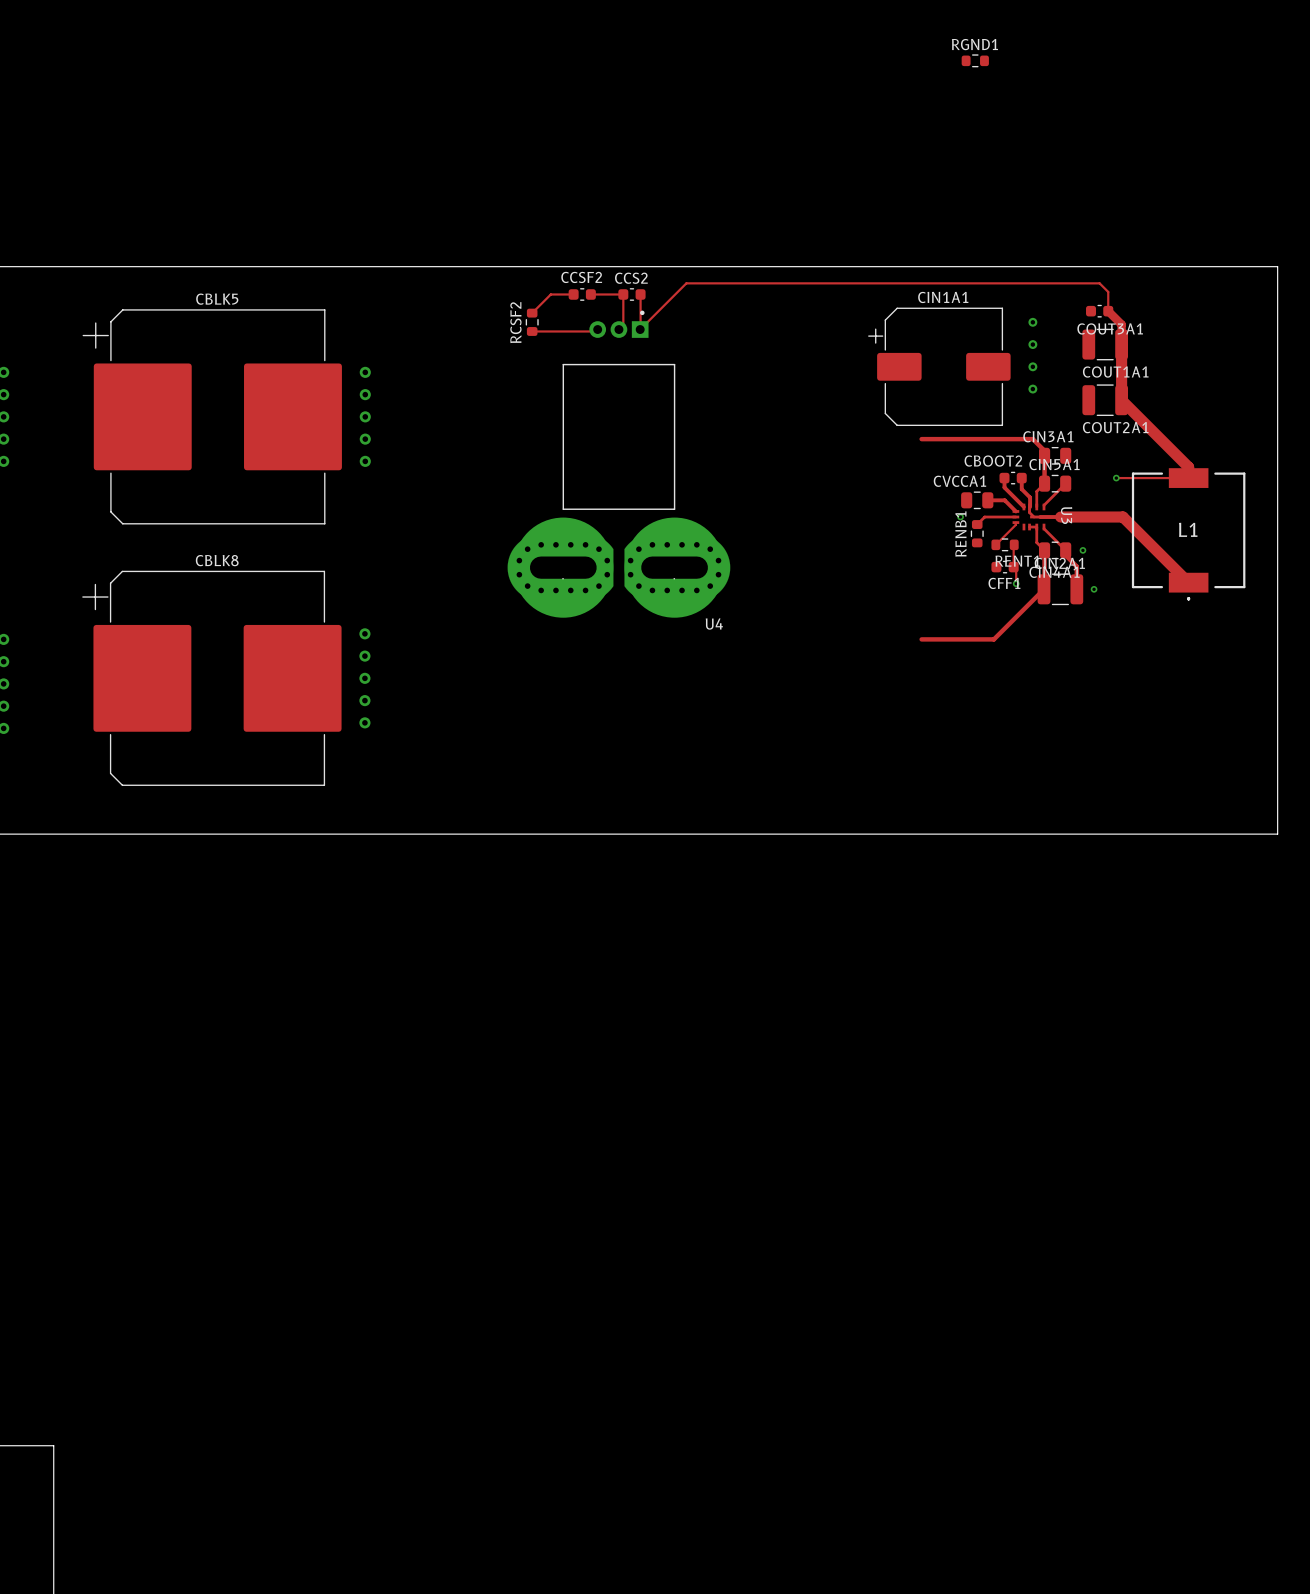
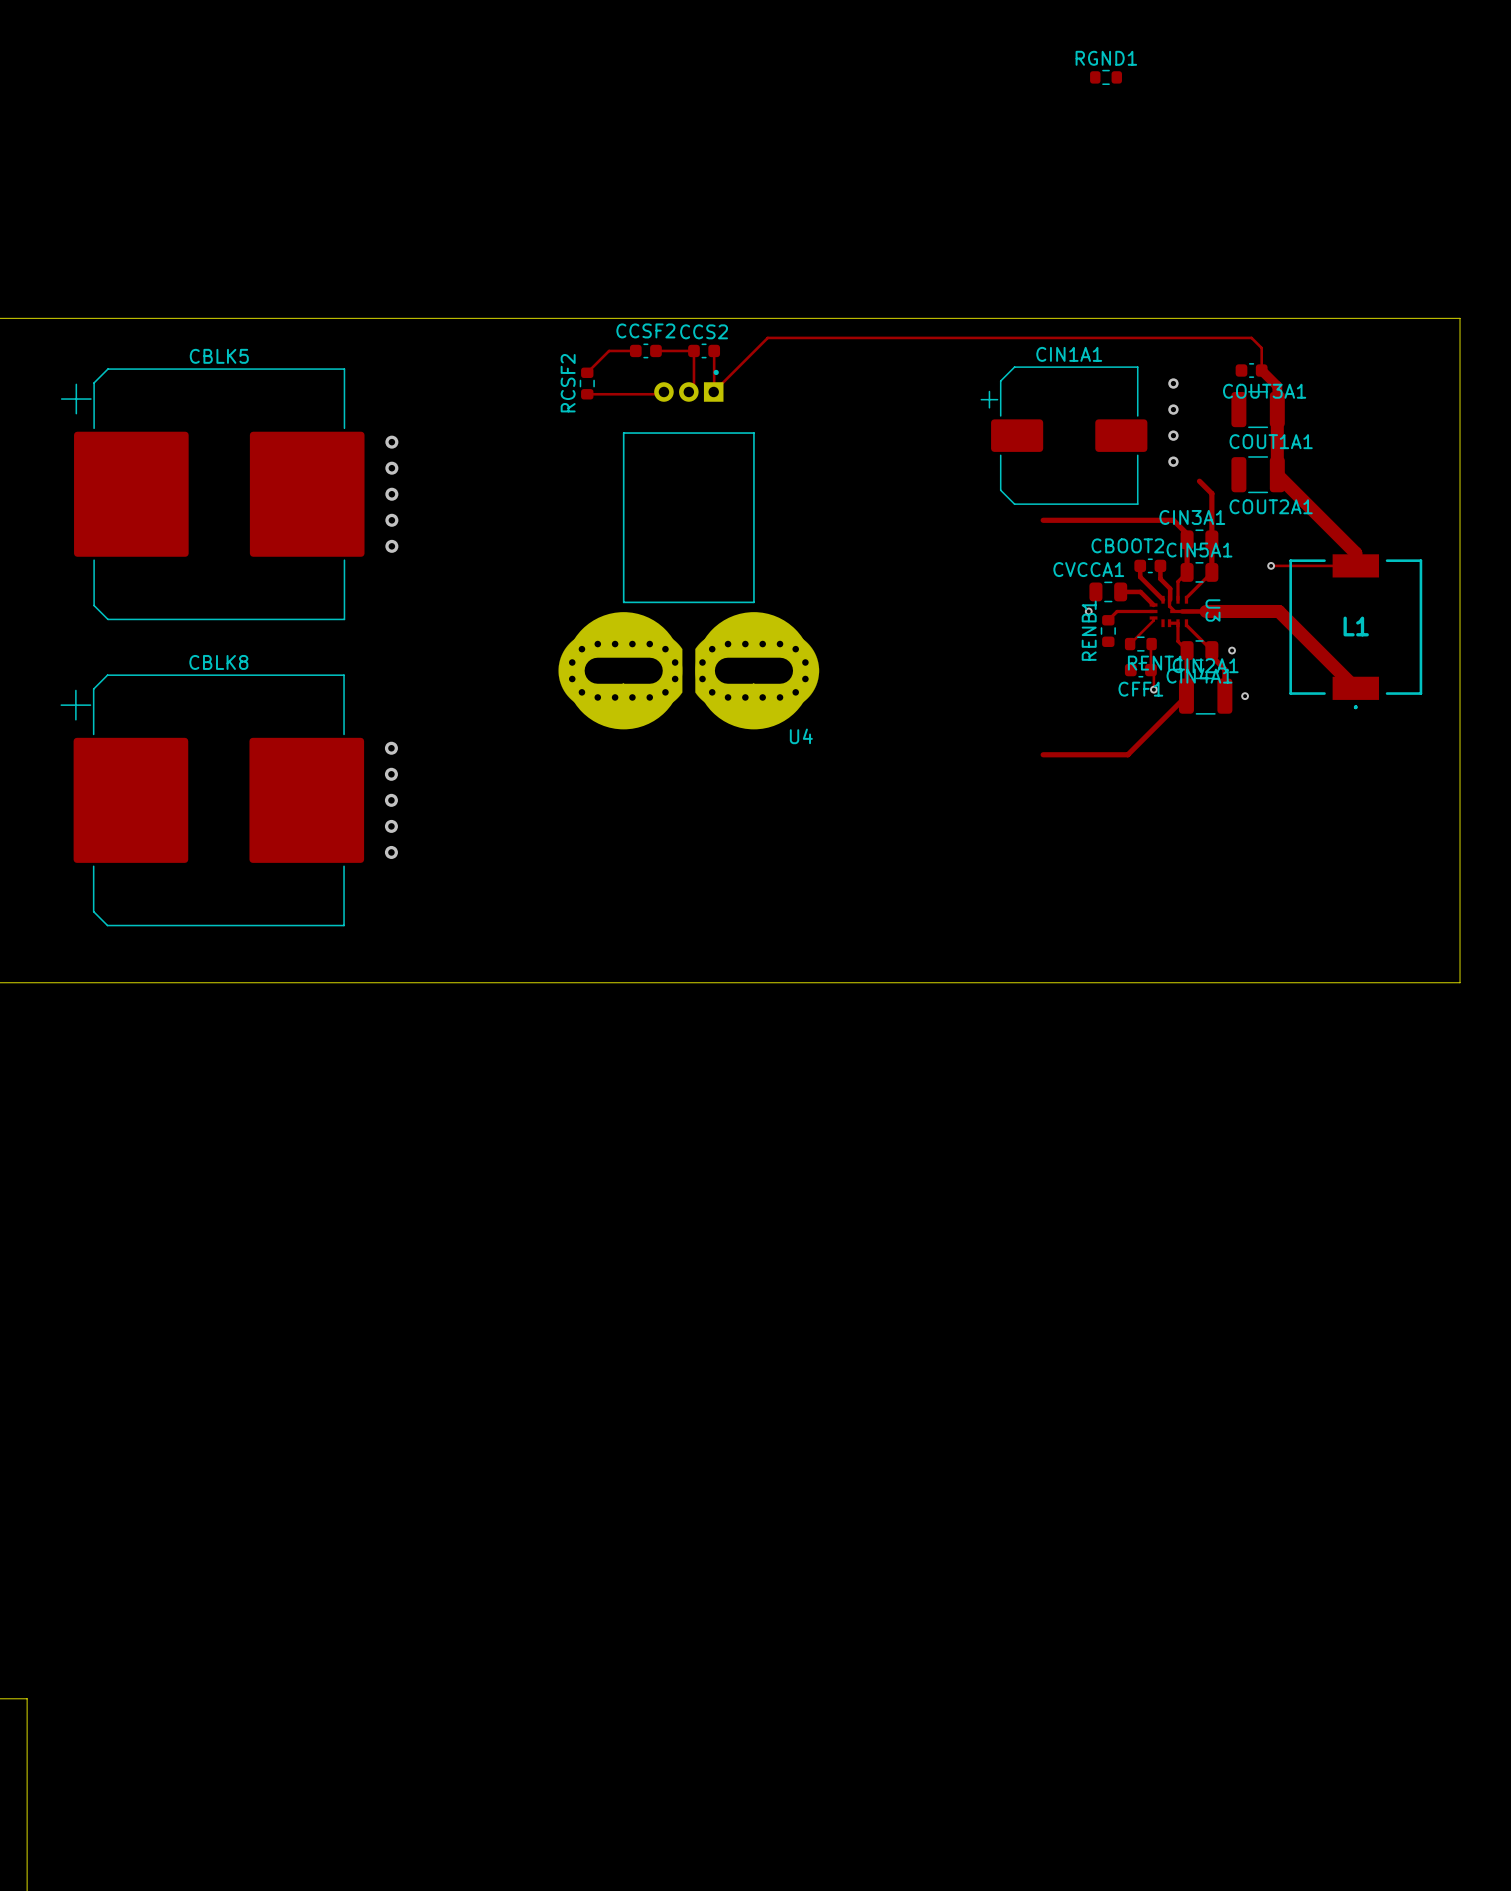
track: none -> (1199, 481) (1211, 493) (1211, 572)

